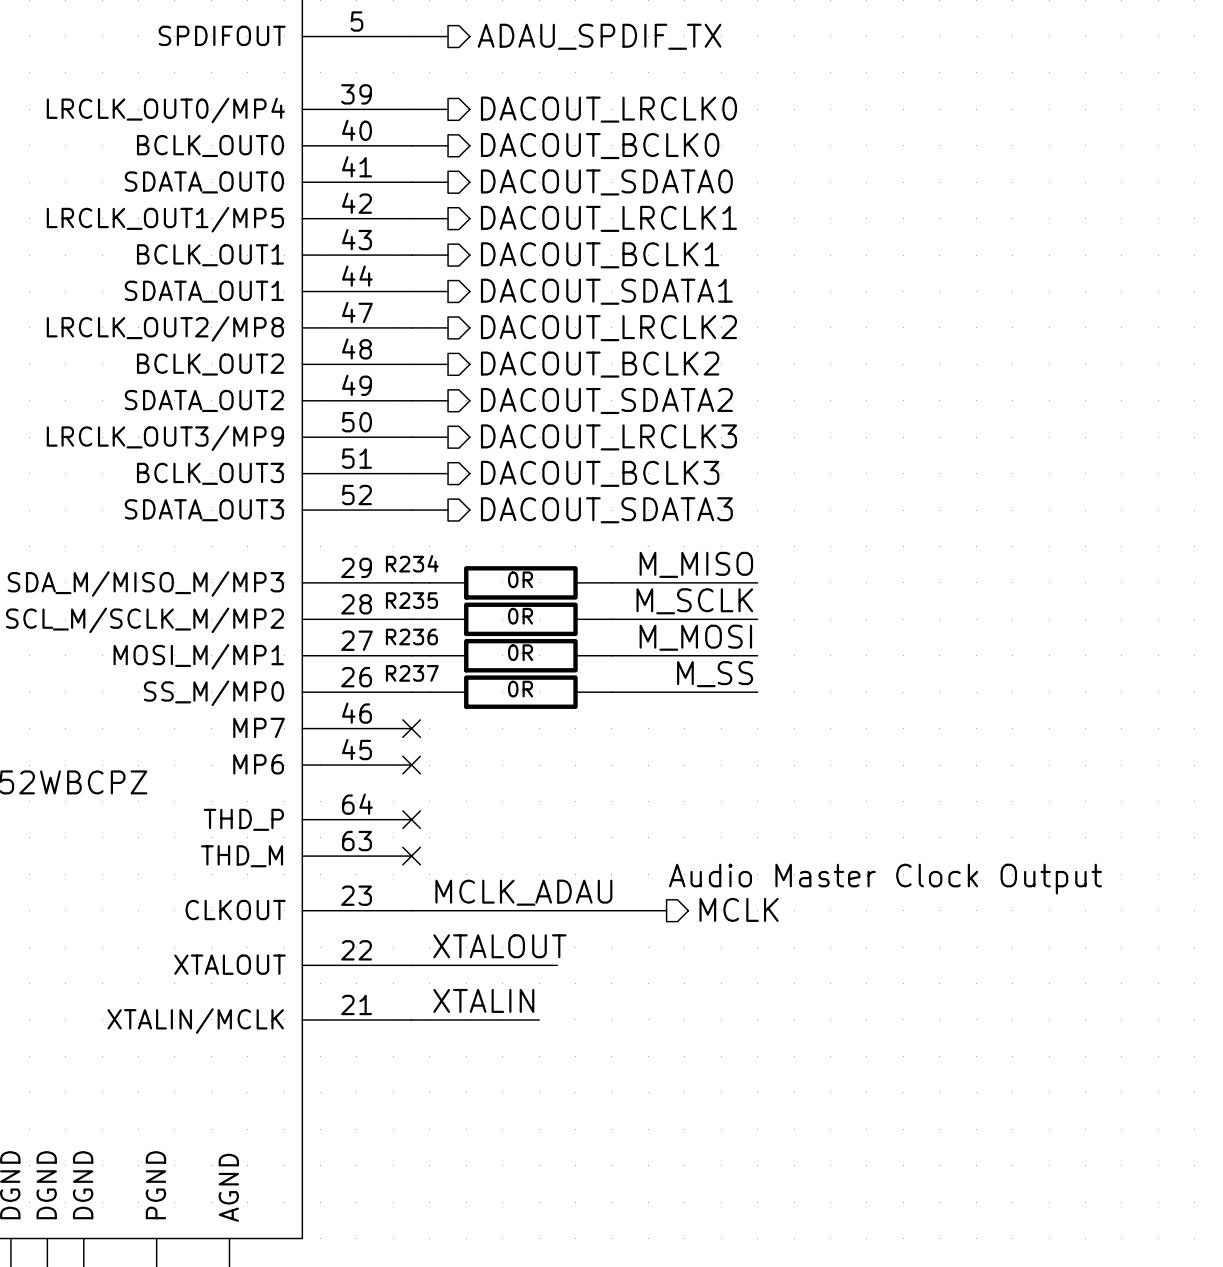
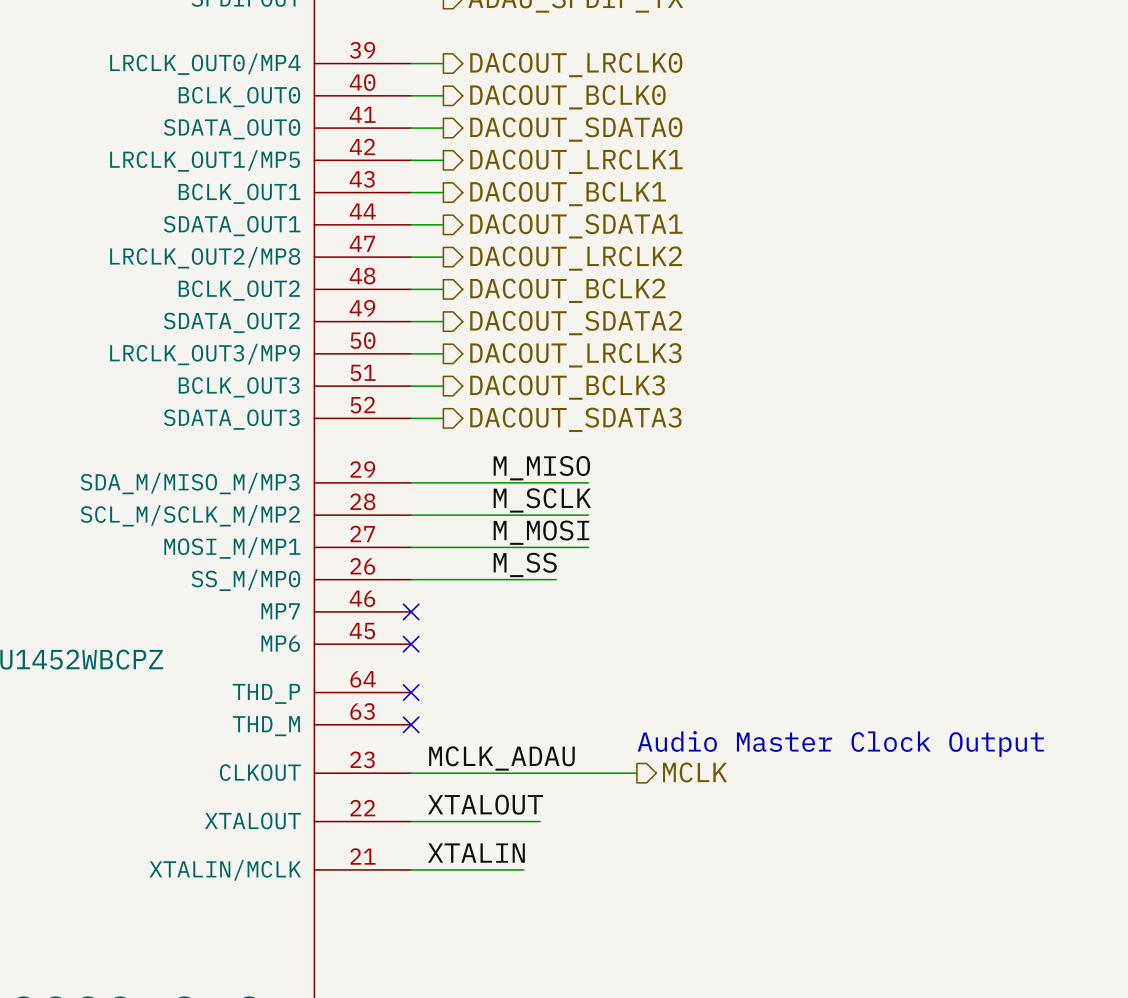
label position: M_MISO (696, 564) -> M_MISO (541, 468)
R234: 0R (520, 582) -> none
wire: (611, 582) (757, 582) -> (588, 482) (427, 482)
label position: M_SCLK (694, 601) -> M_SCLK (542, 500)
R235: 0R (520, 619) -> none
wire: (611, 619) (757, 619) -> (588, 515) (427, 515)
label position: M_MOSI (695, 637) -> M_MOSI (541, 532)
R236: 0R (520, 655) -> none
wire: (611, 655) (757, 655) -> (588, 547) (427, 547)
label position: M_SS (715, 674) -> M_SS (525, 564)
R237: 0R (520, 692) -> none
wire: (611, 692) (757, 692) -> (427, 579) (556, 579)

